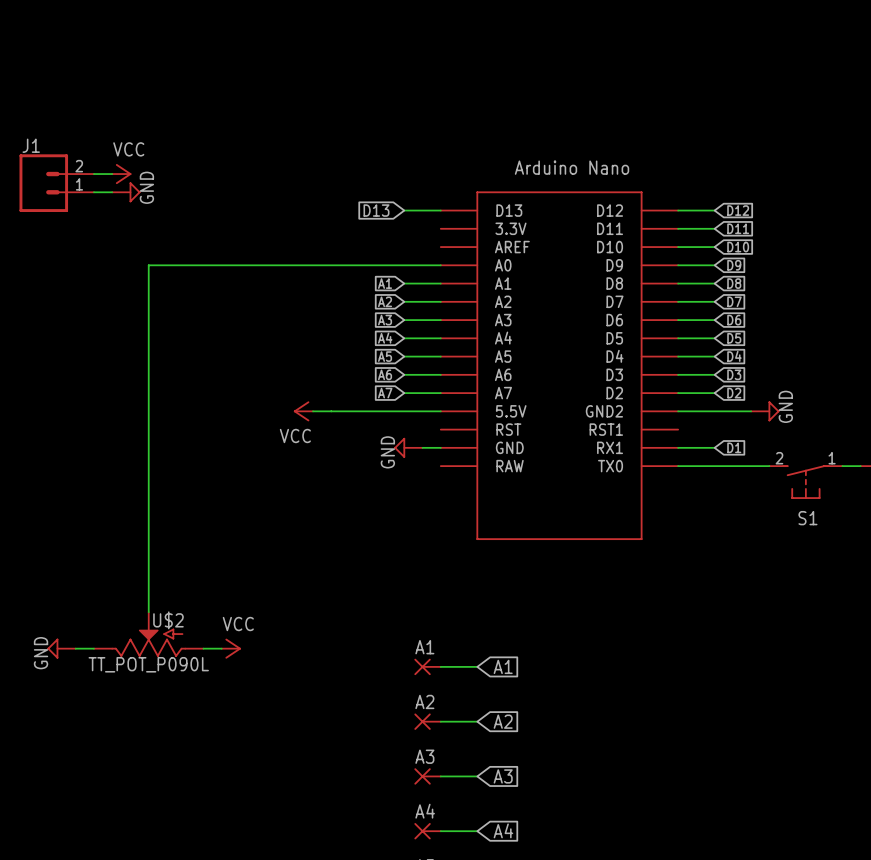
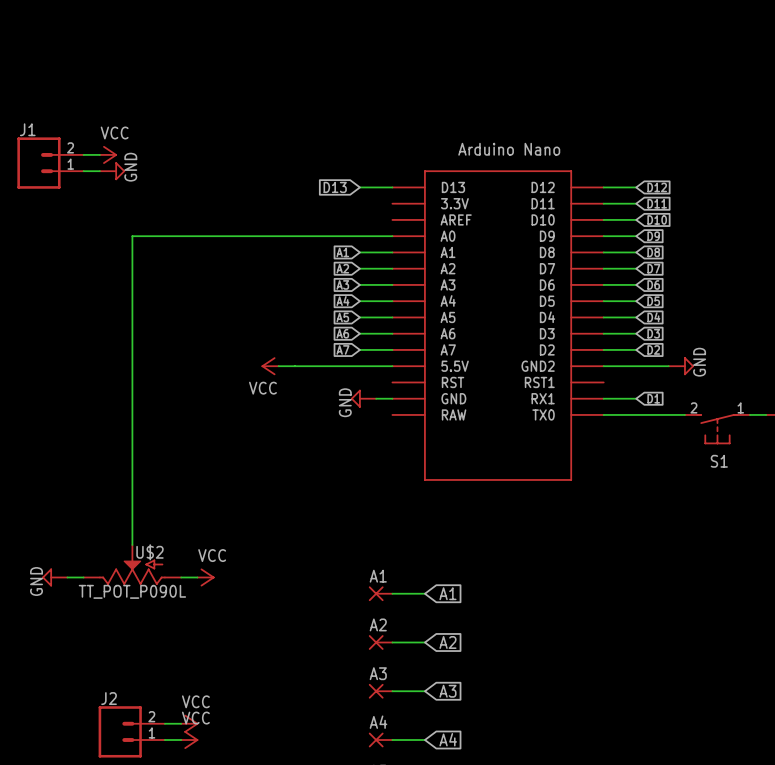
wire: none -> (164, 723) (181, 723)
power symbol: none -> VCC (189, 723)
J2: none -> (131, 731)
wire: none -> (164, 740) (181, 740)
power symbol: none -> VCC (189, 740)

